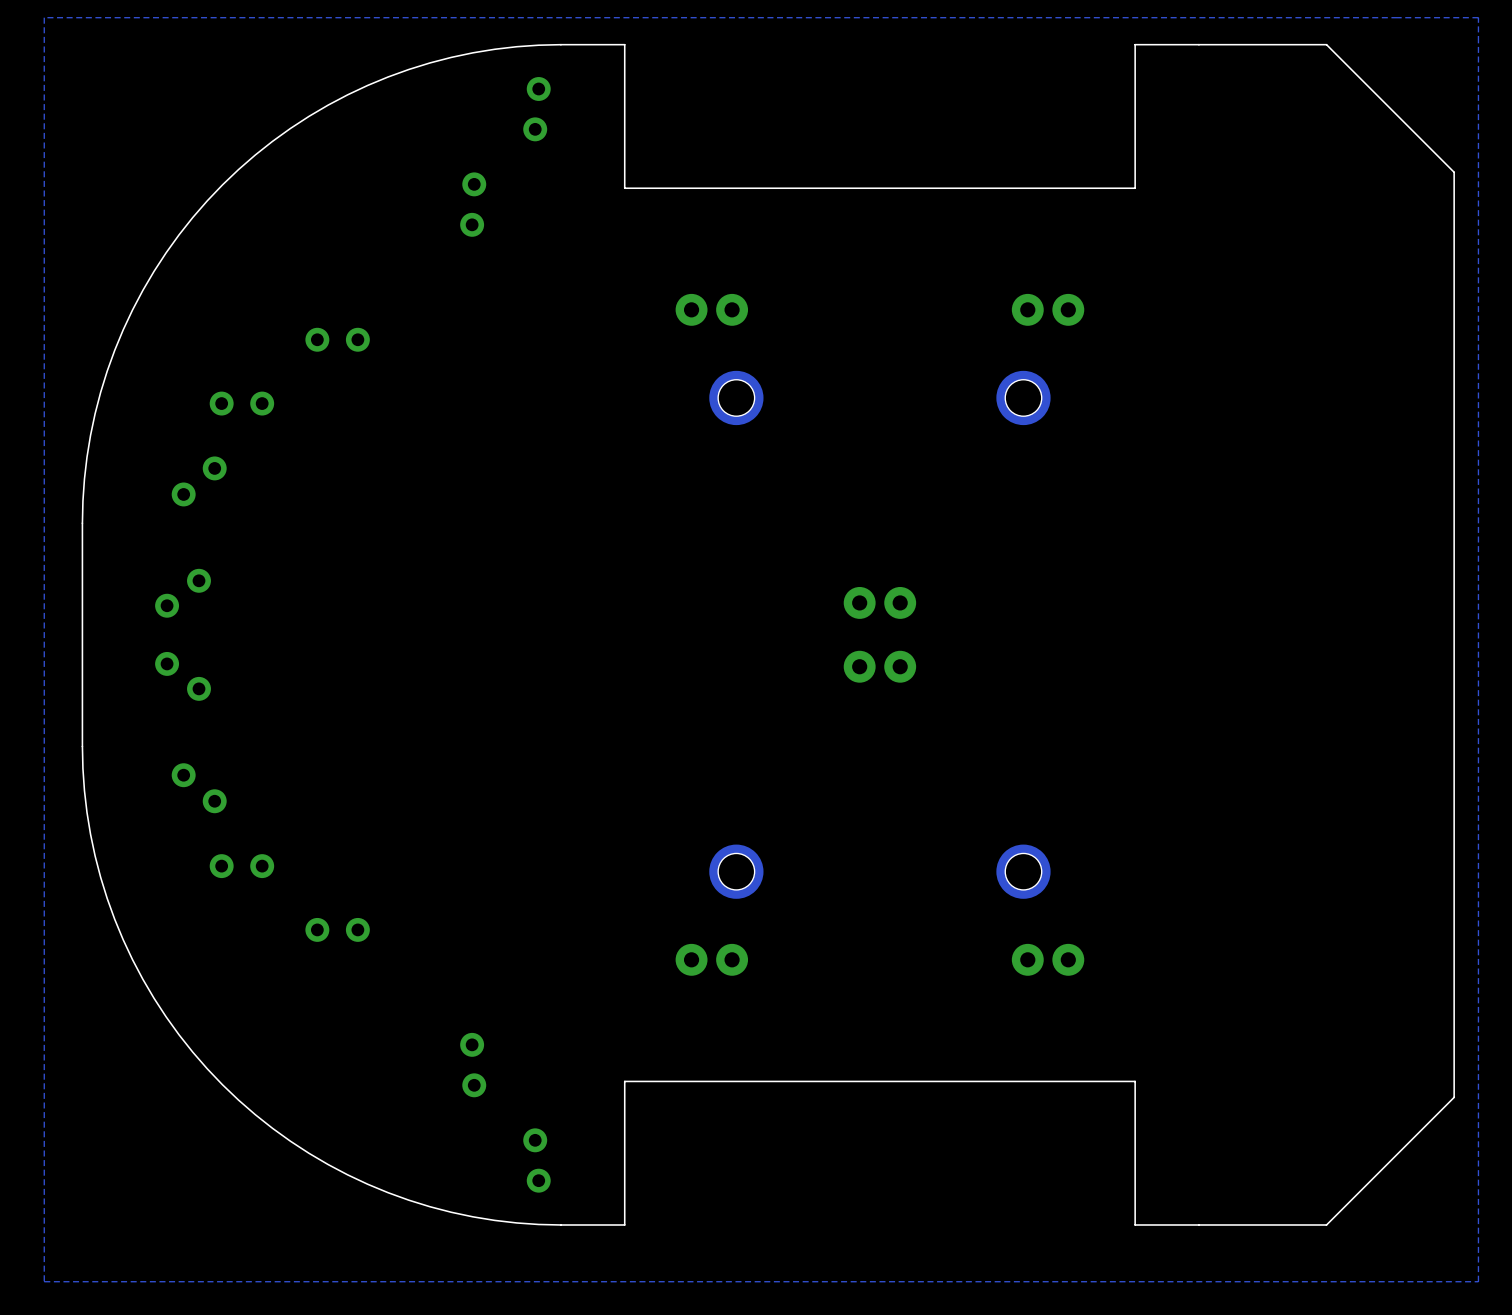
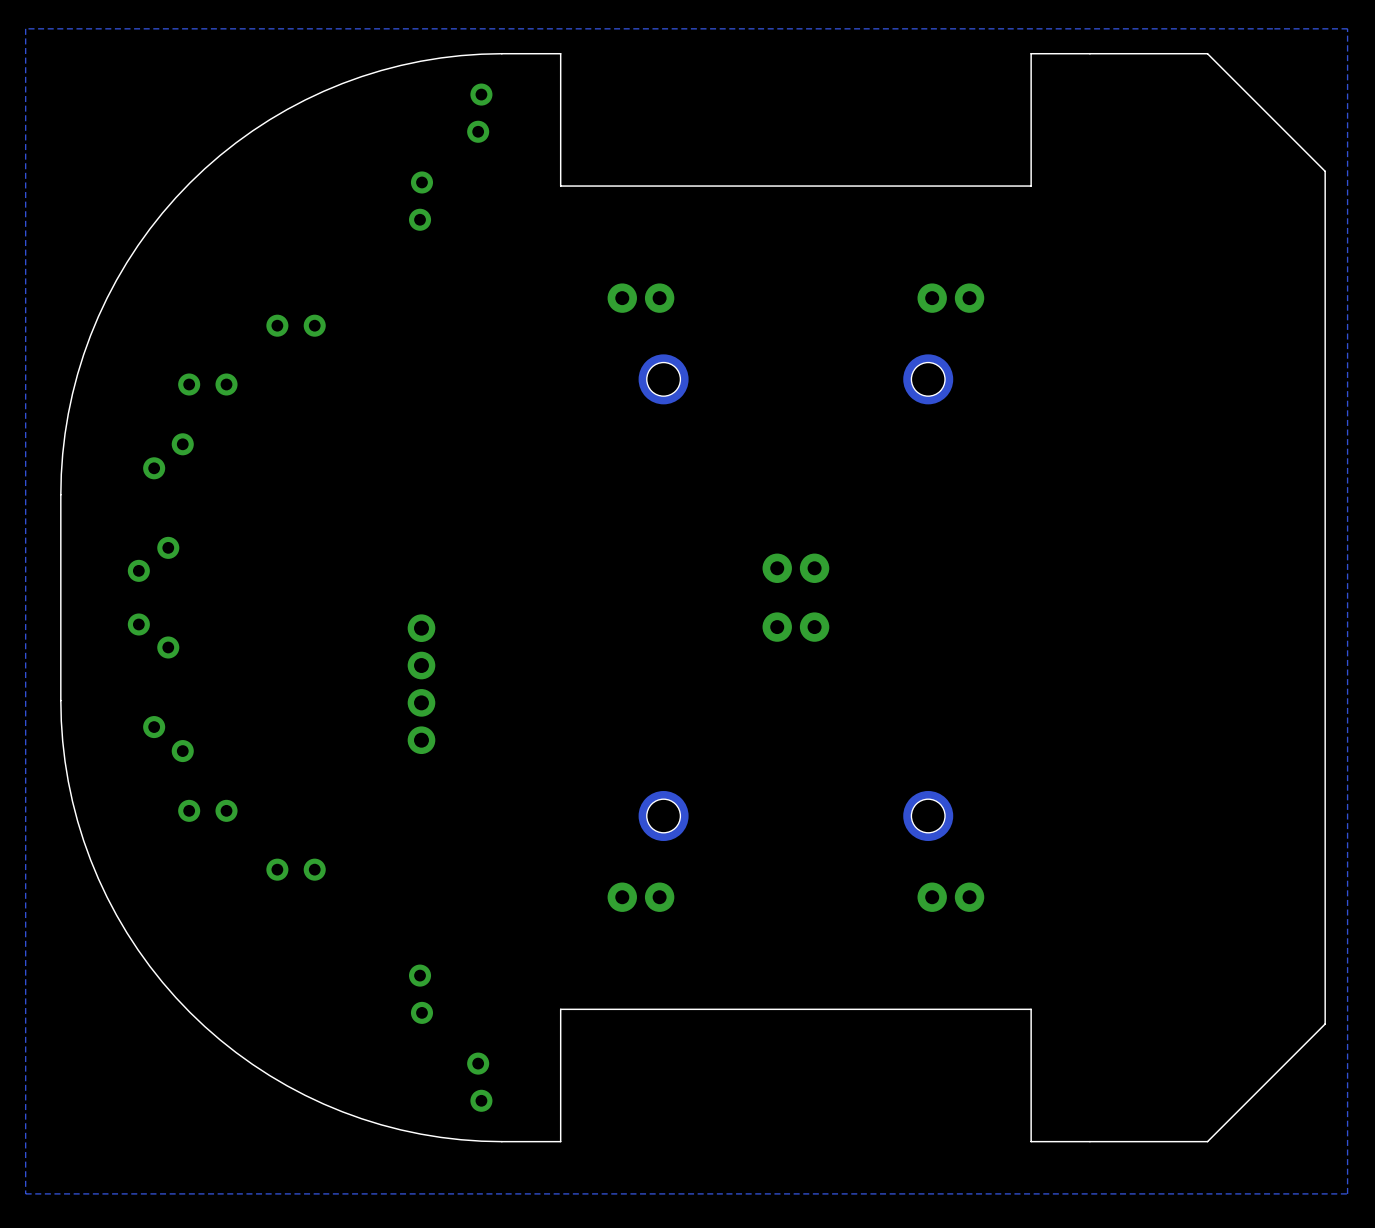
part: none -> (421, 684)

